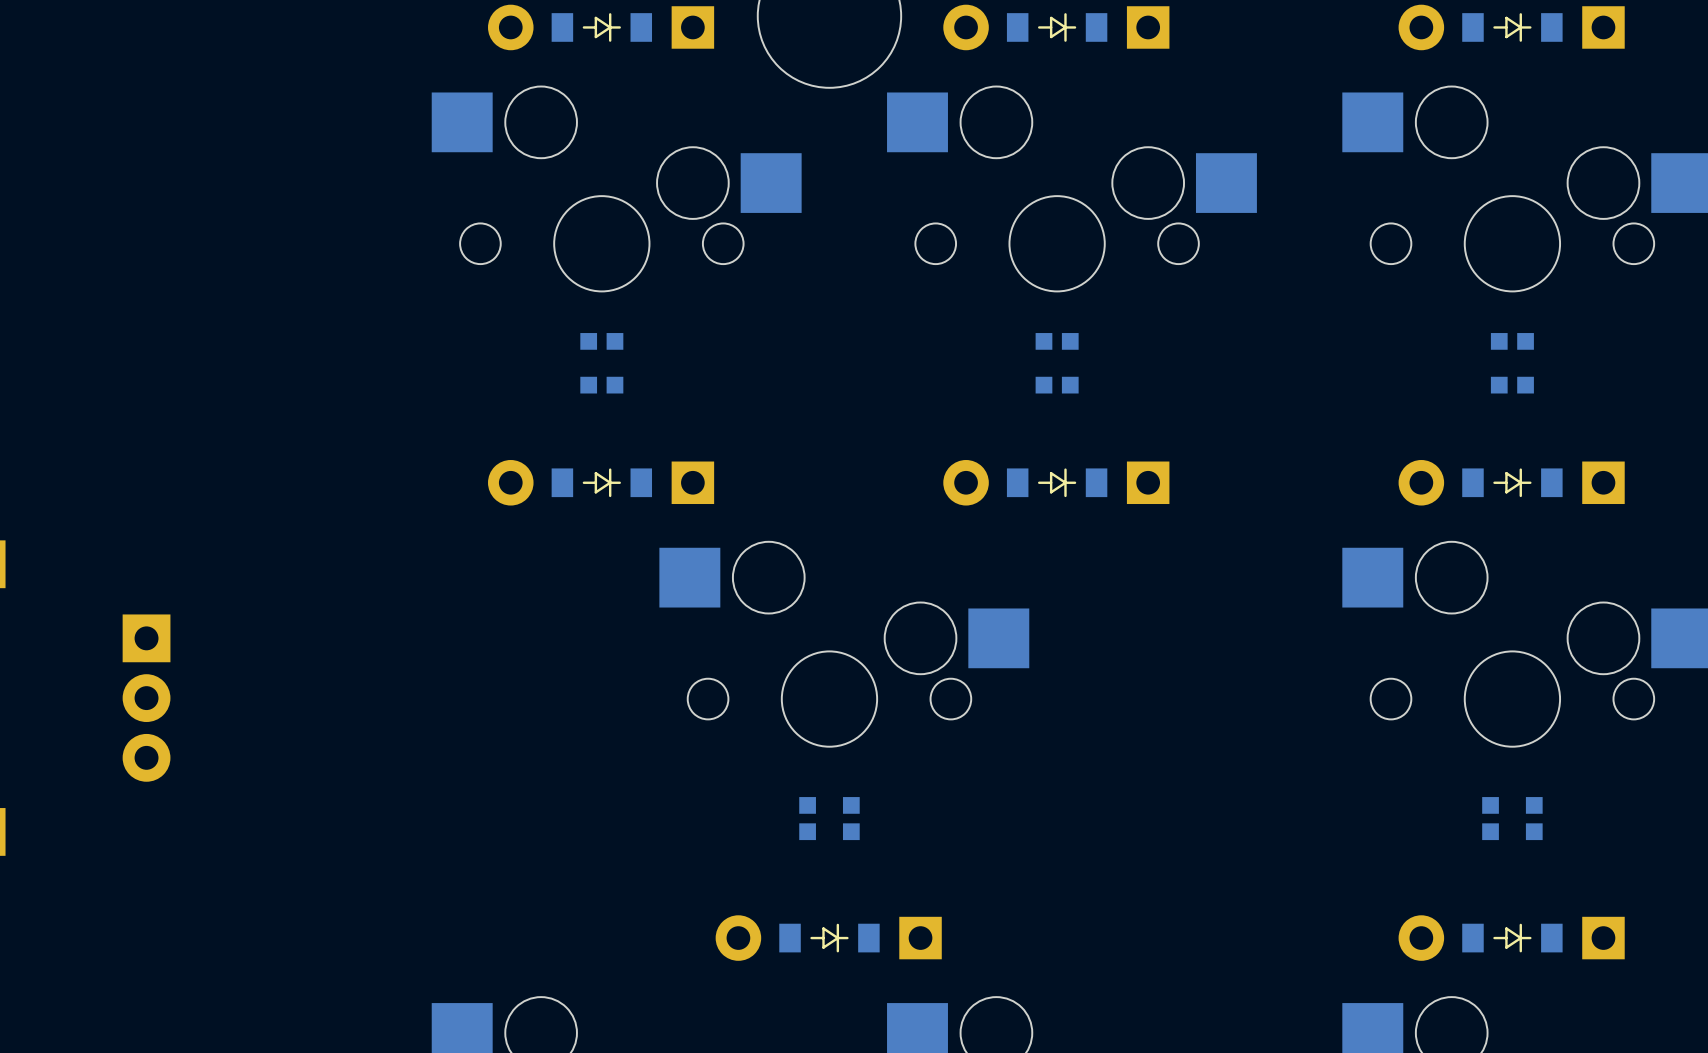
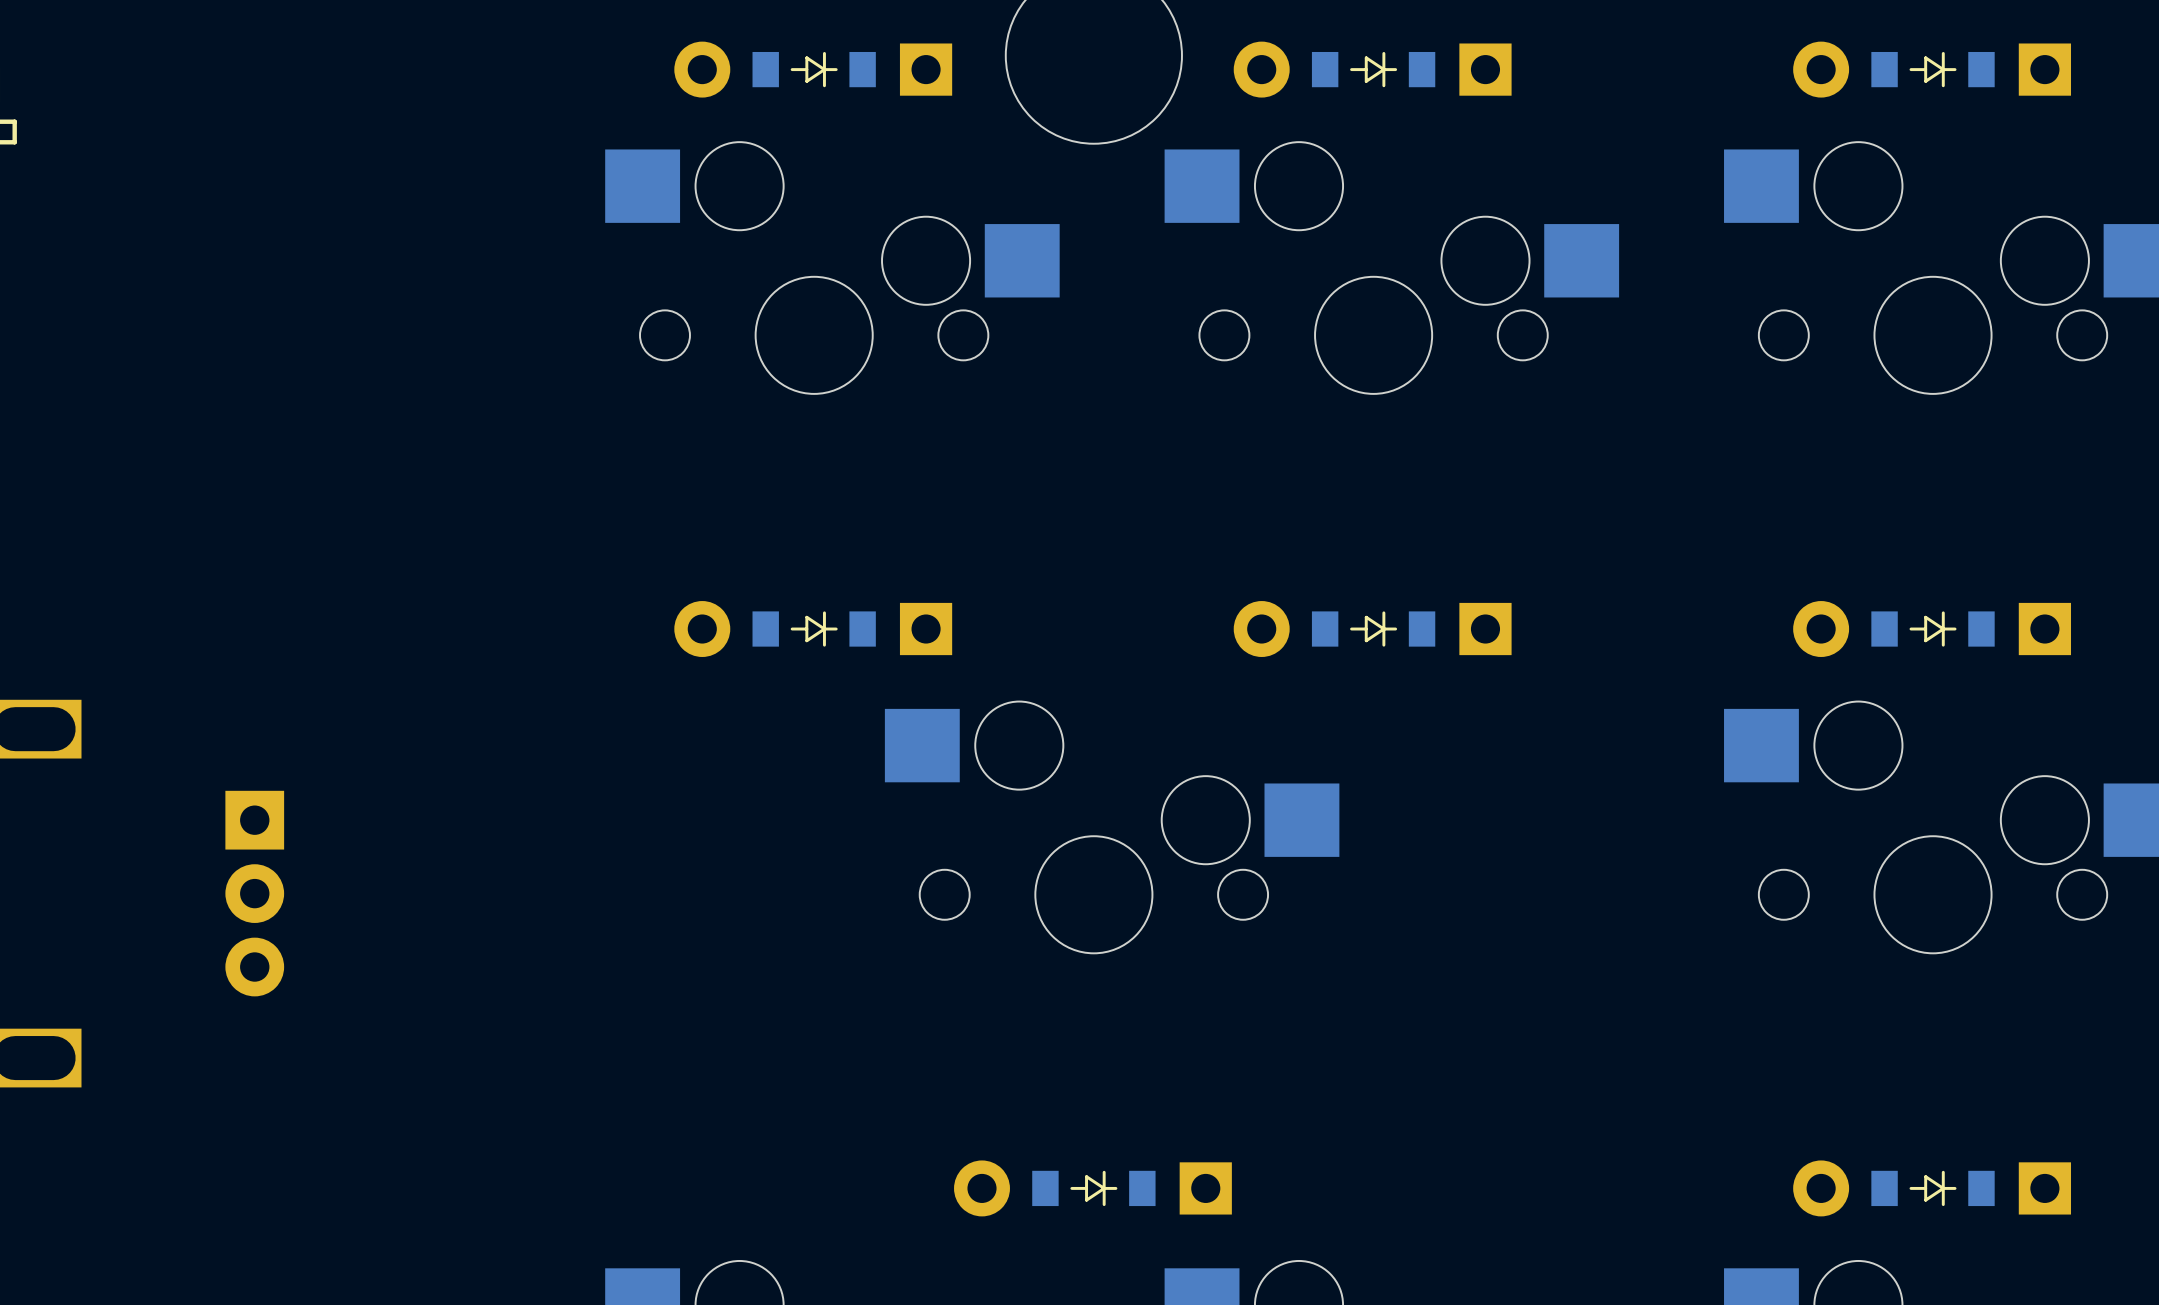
part: (601, 363) -> none
part: (1057, 363) -> none
part: (1512, 363) -> none
part: (829, 818) -> none
part: (1512, 818) -> none

